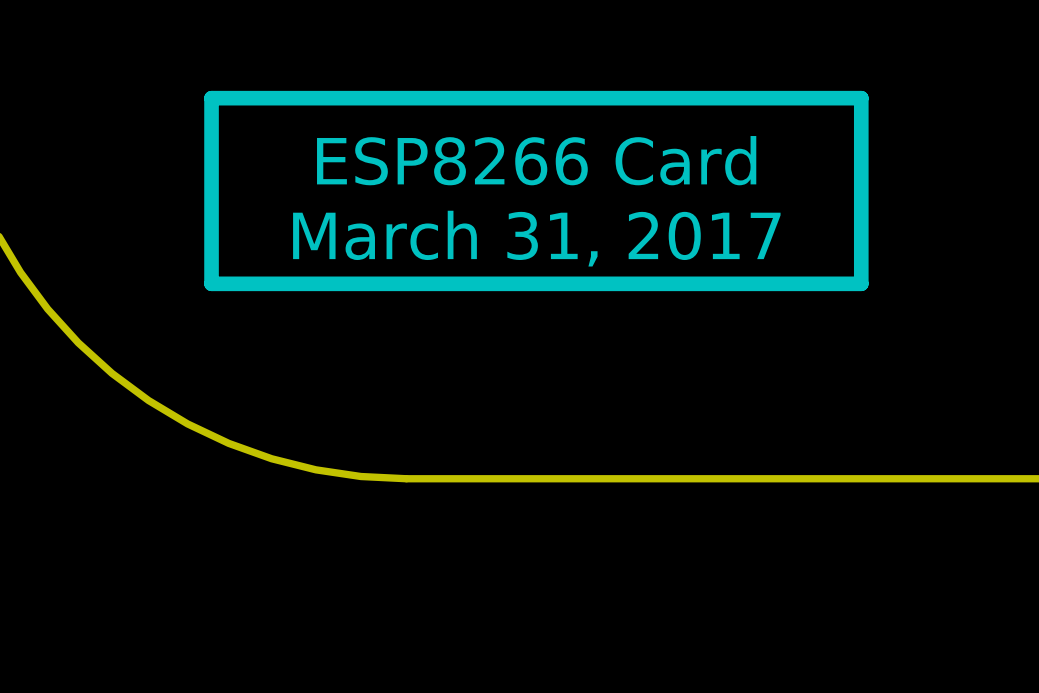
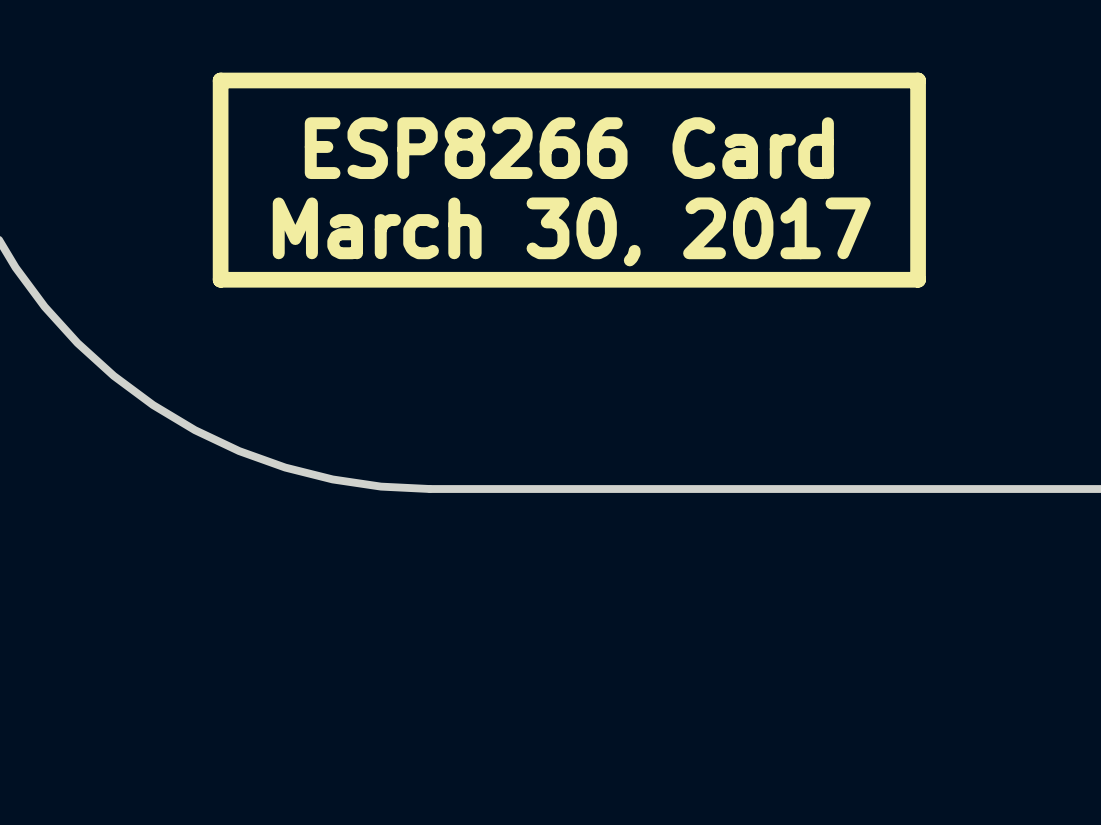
text: March 31, 2017 (536, 238) -> March 30, 2017 (571, 231)

